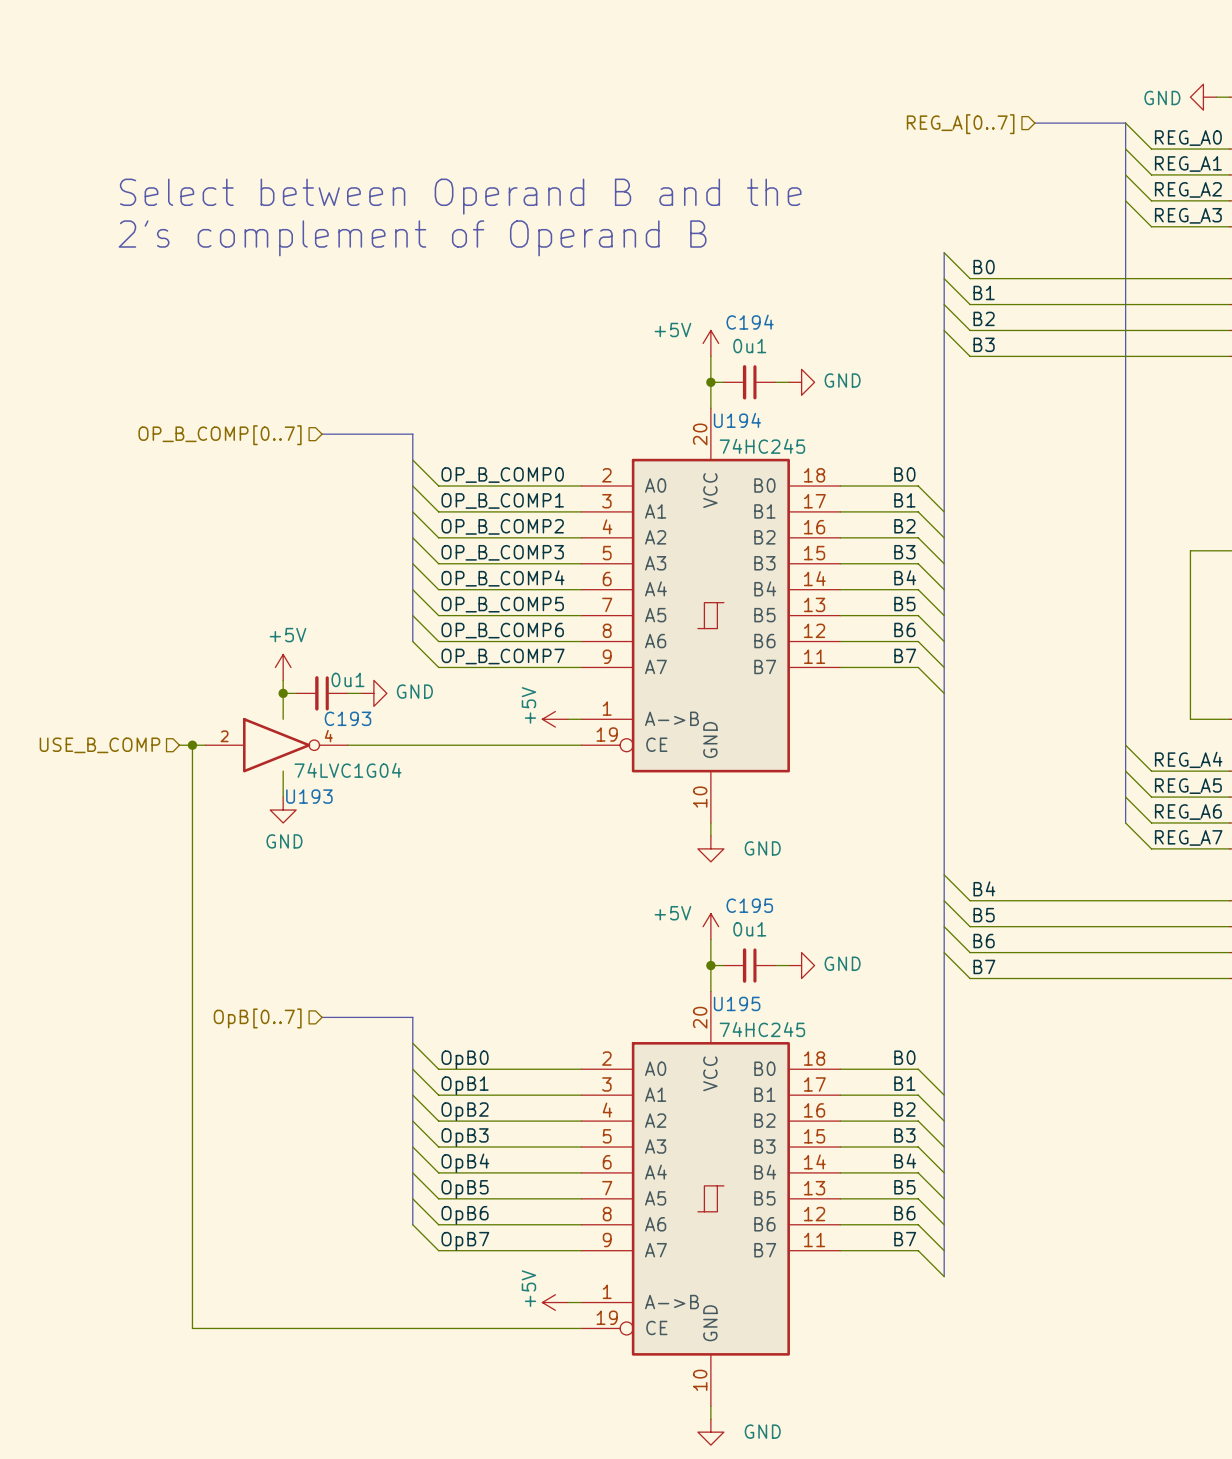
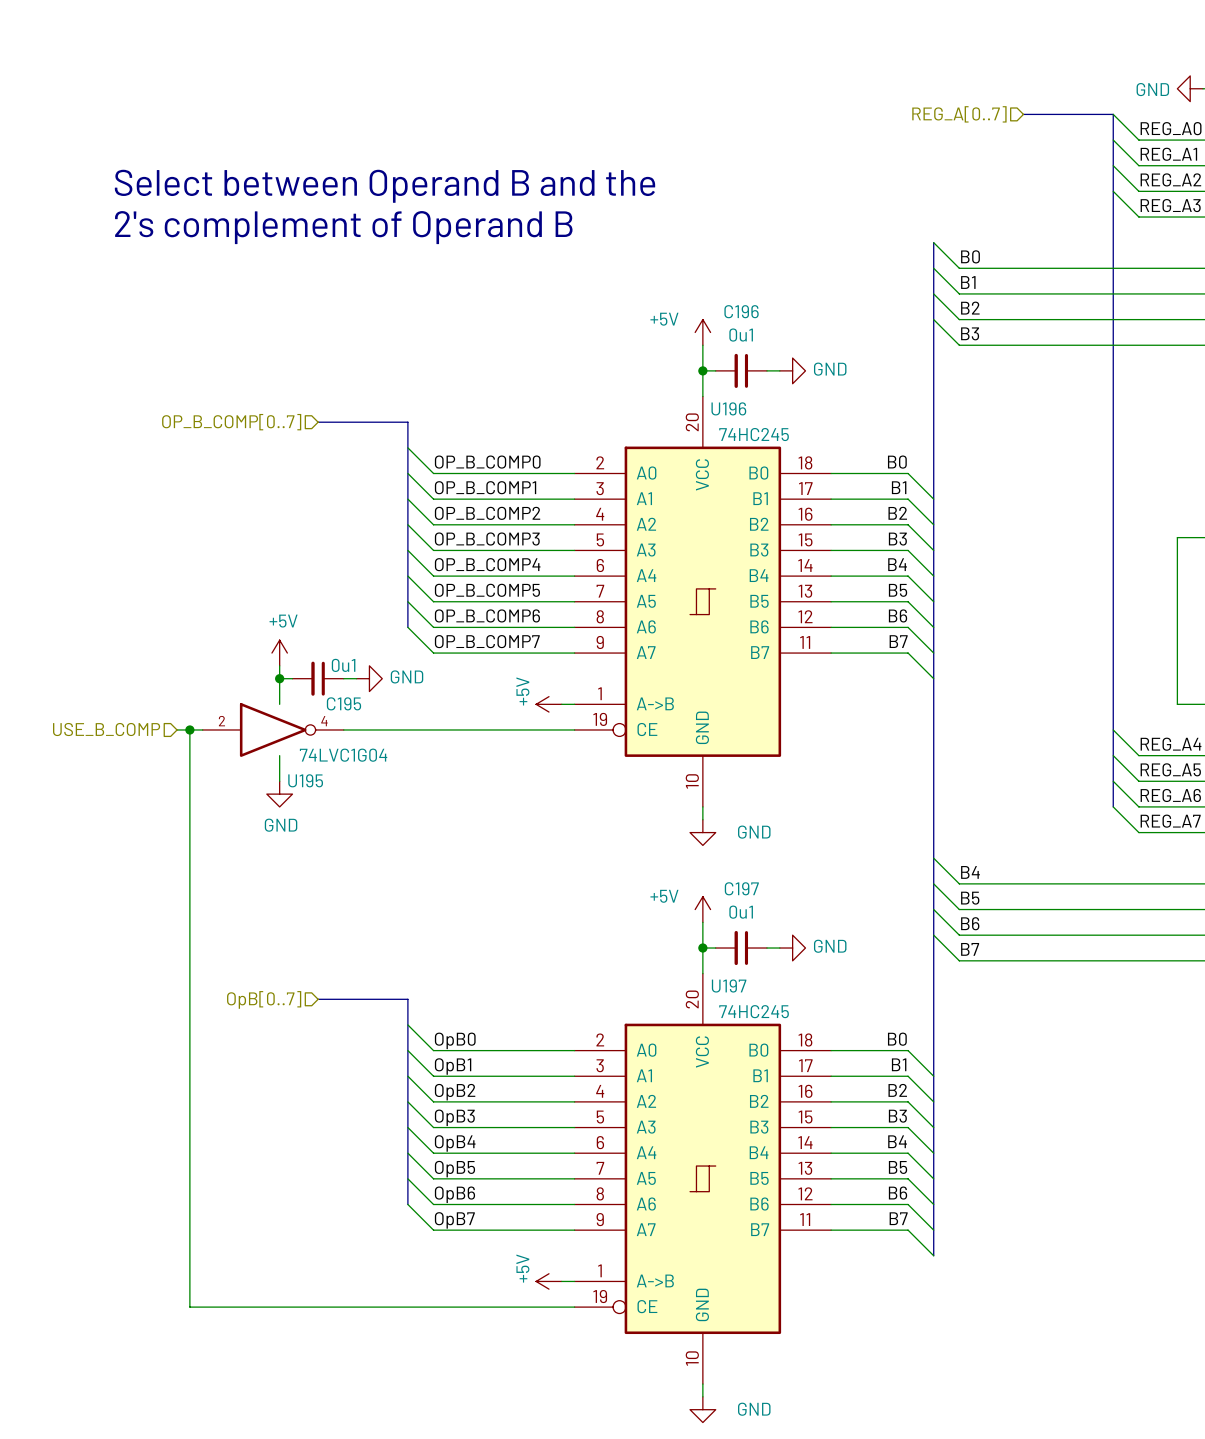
C194 name: C194 (750, 322) -> C196 (741, 311)
U194 name: U194 (737, 420) -> U196 (728, 408)
C193 name: C193 (347, 718) -> C195 (343, 703)
U193 name: U193 (309, 796) -> U195 (305, 780)
C195 name: C195 (749, 905) -> C197 (741, 888)
U195 name: U195 (737, 1003) -> U197 (729, 986)

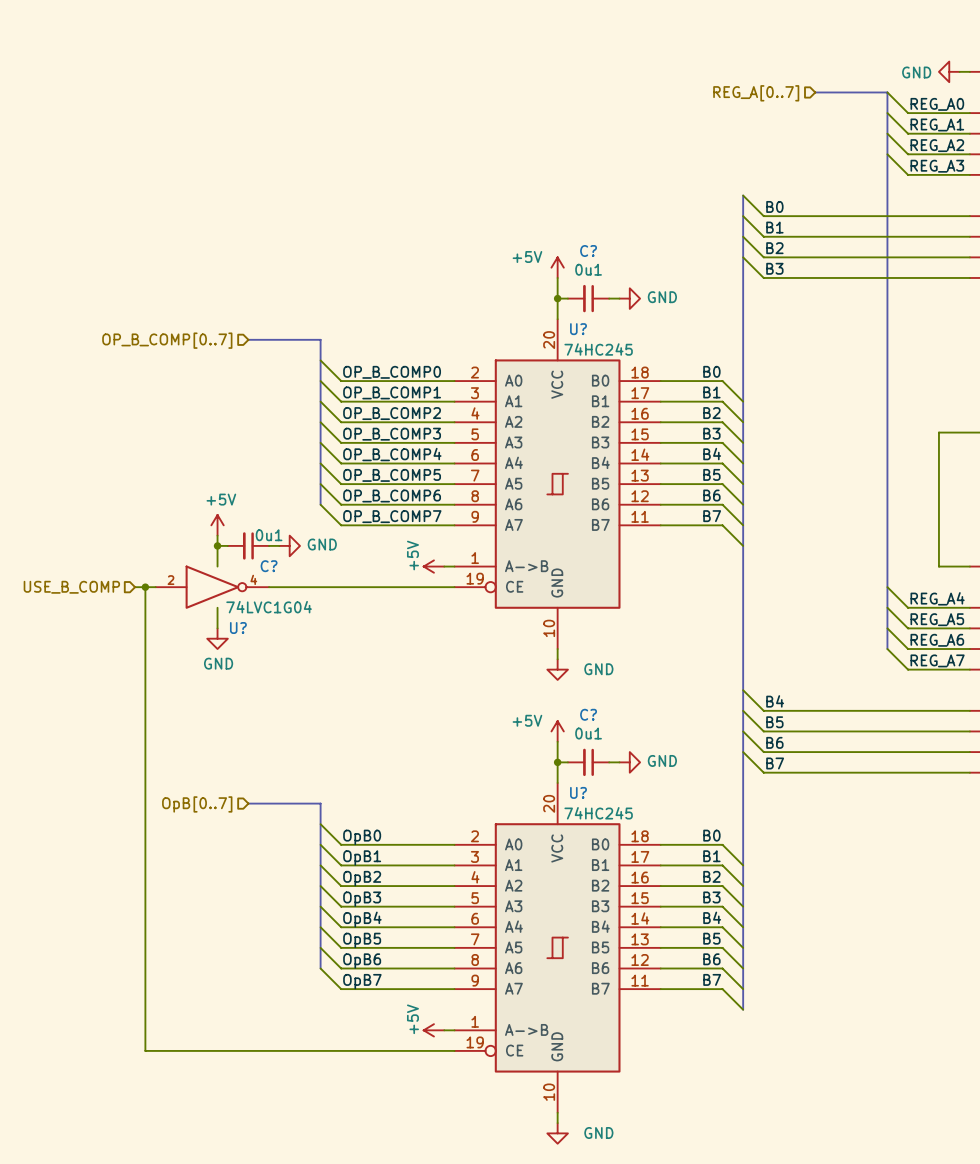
text: Select between Operand B and the (385, 186) -> none
text: 2's complement of Operand B (343, 227) -> none
C196 name: C196 (741, 311) -> C? (588, 251)
U196 name: U196 (728, 408) -> U? (578, 329)
C195 name: C195 (343, 703) -> C? (269, 566)
U195 name: U195 (305, 780) -> U? (238, 628)
C197 name: C197 (741, 888) -> C? (588, 714)
U197 name: U197 (729, 986) -> U? (578, 792)

